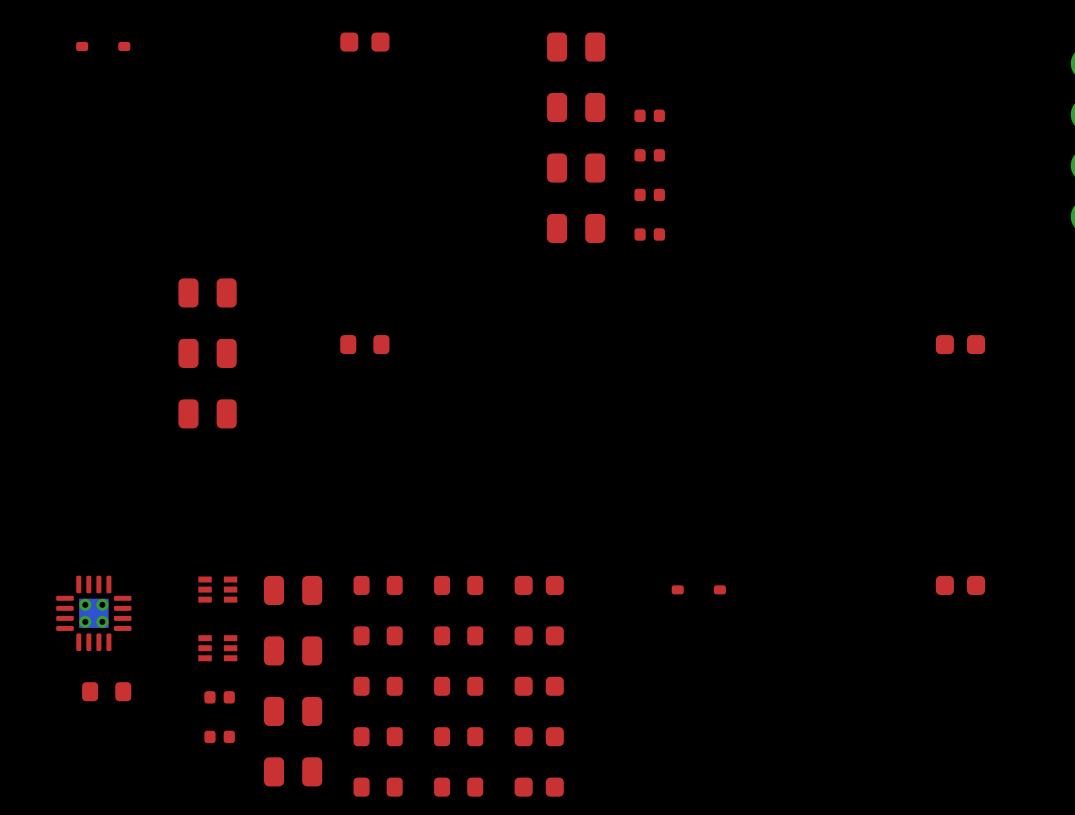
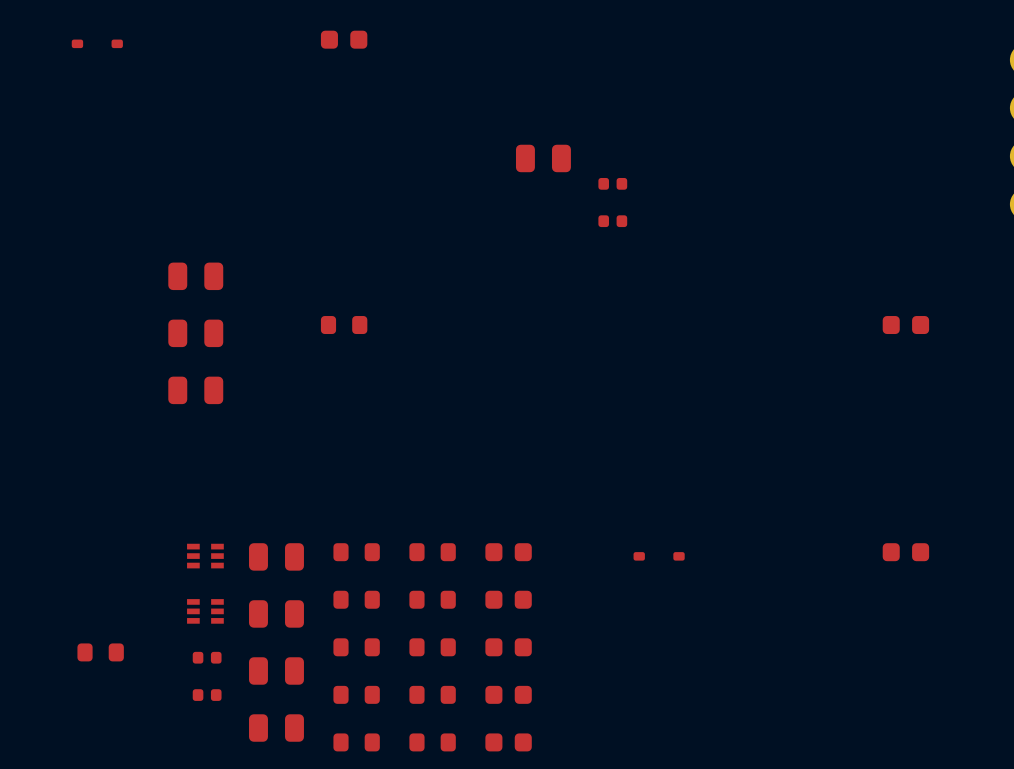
part: (576, 47) -> none
part: (576, 107) -> none
part: (649, 115) -> none
part: (649, 155) -> none
part: (576, 228) -> none
part: (93, 613) -> none

